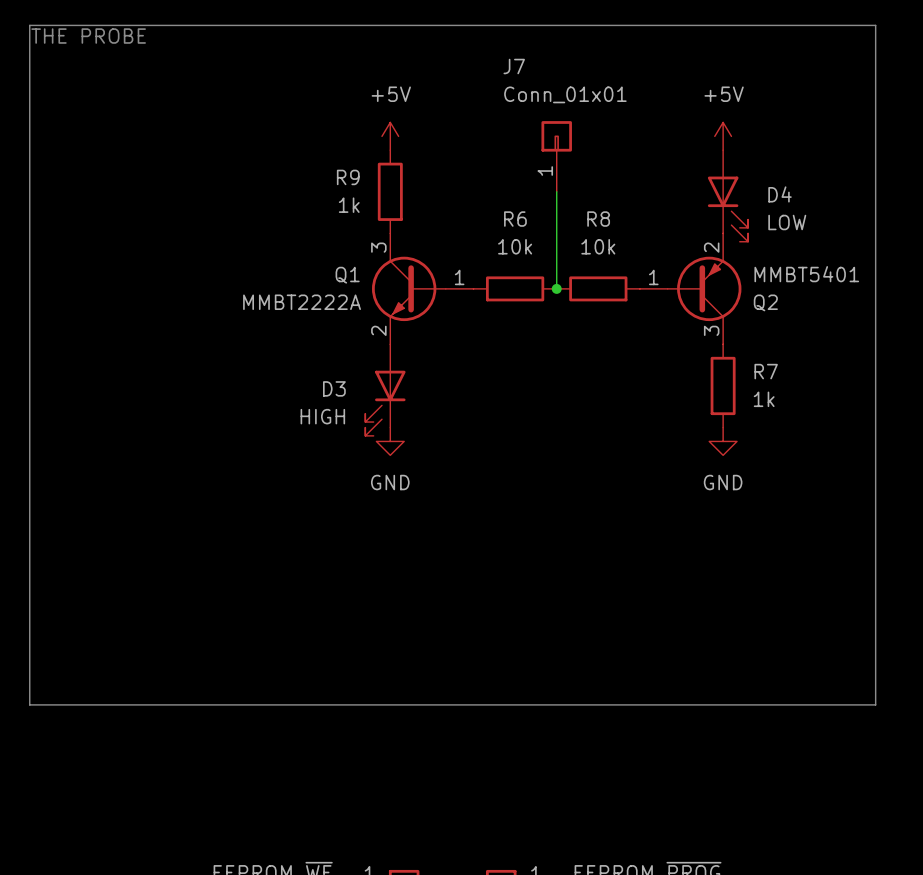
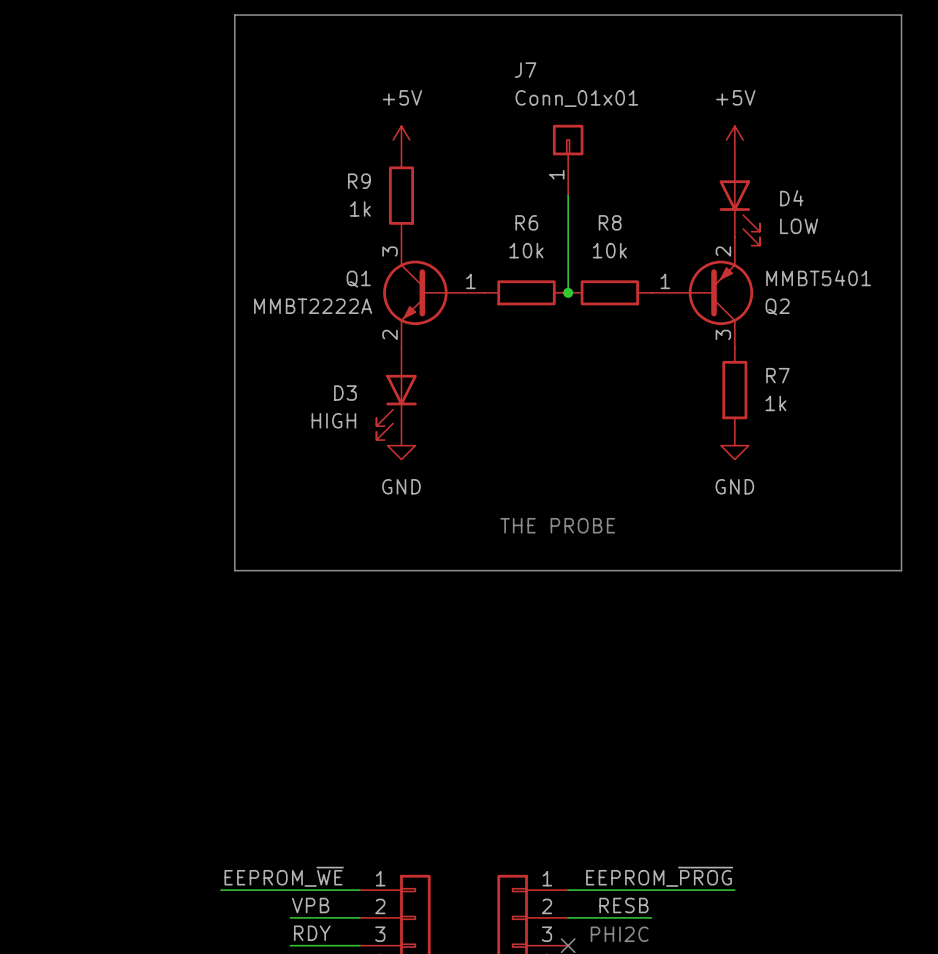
line: (29, 25) (875, 25) (875, 704) (29, 704) (29, 25) -> (234, 15) (234, 570) (901, 570) (901, 15) (234, 15)
text: THE PROBE (88, 36) -> none
text: none -> THE PROBE (557, 525)

